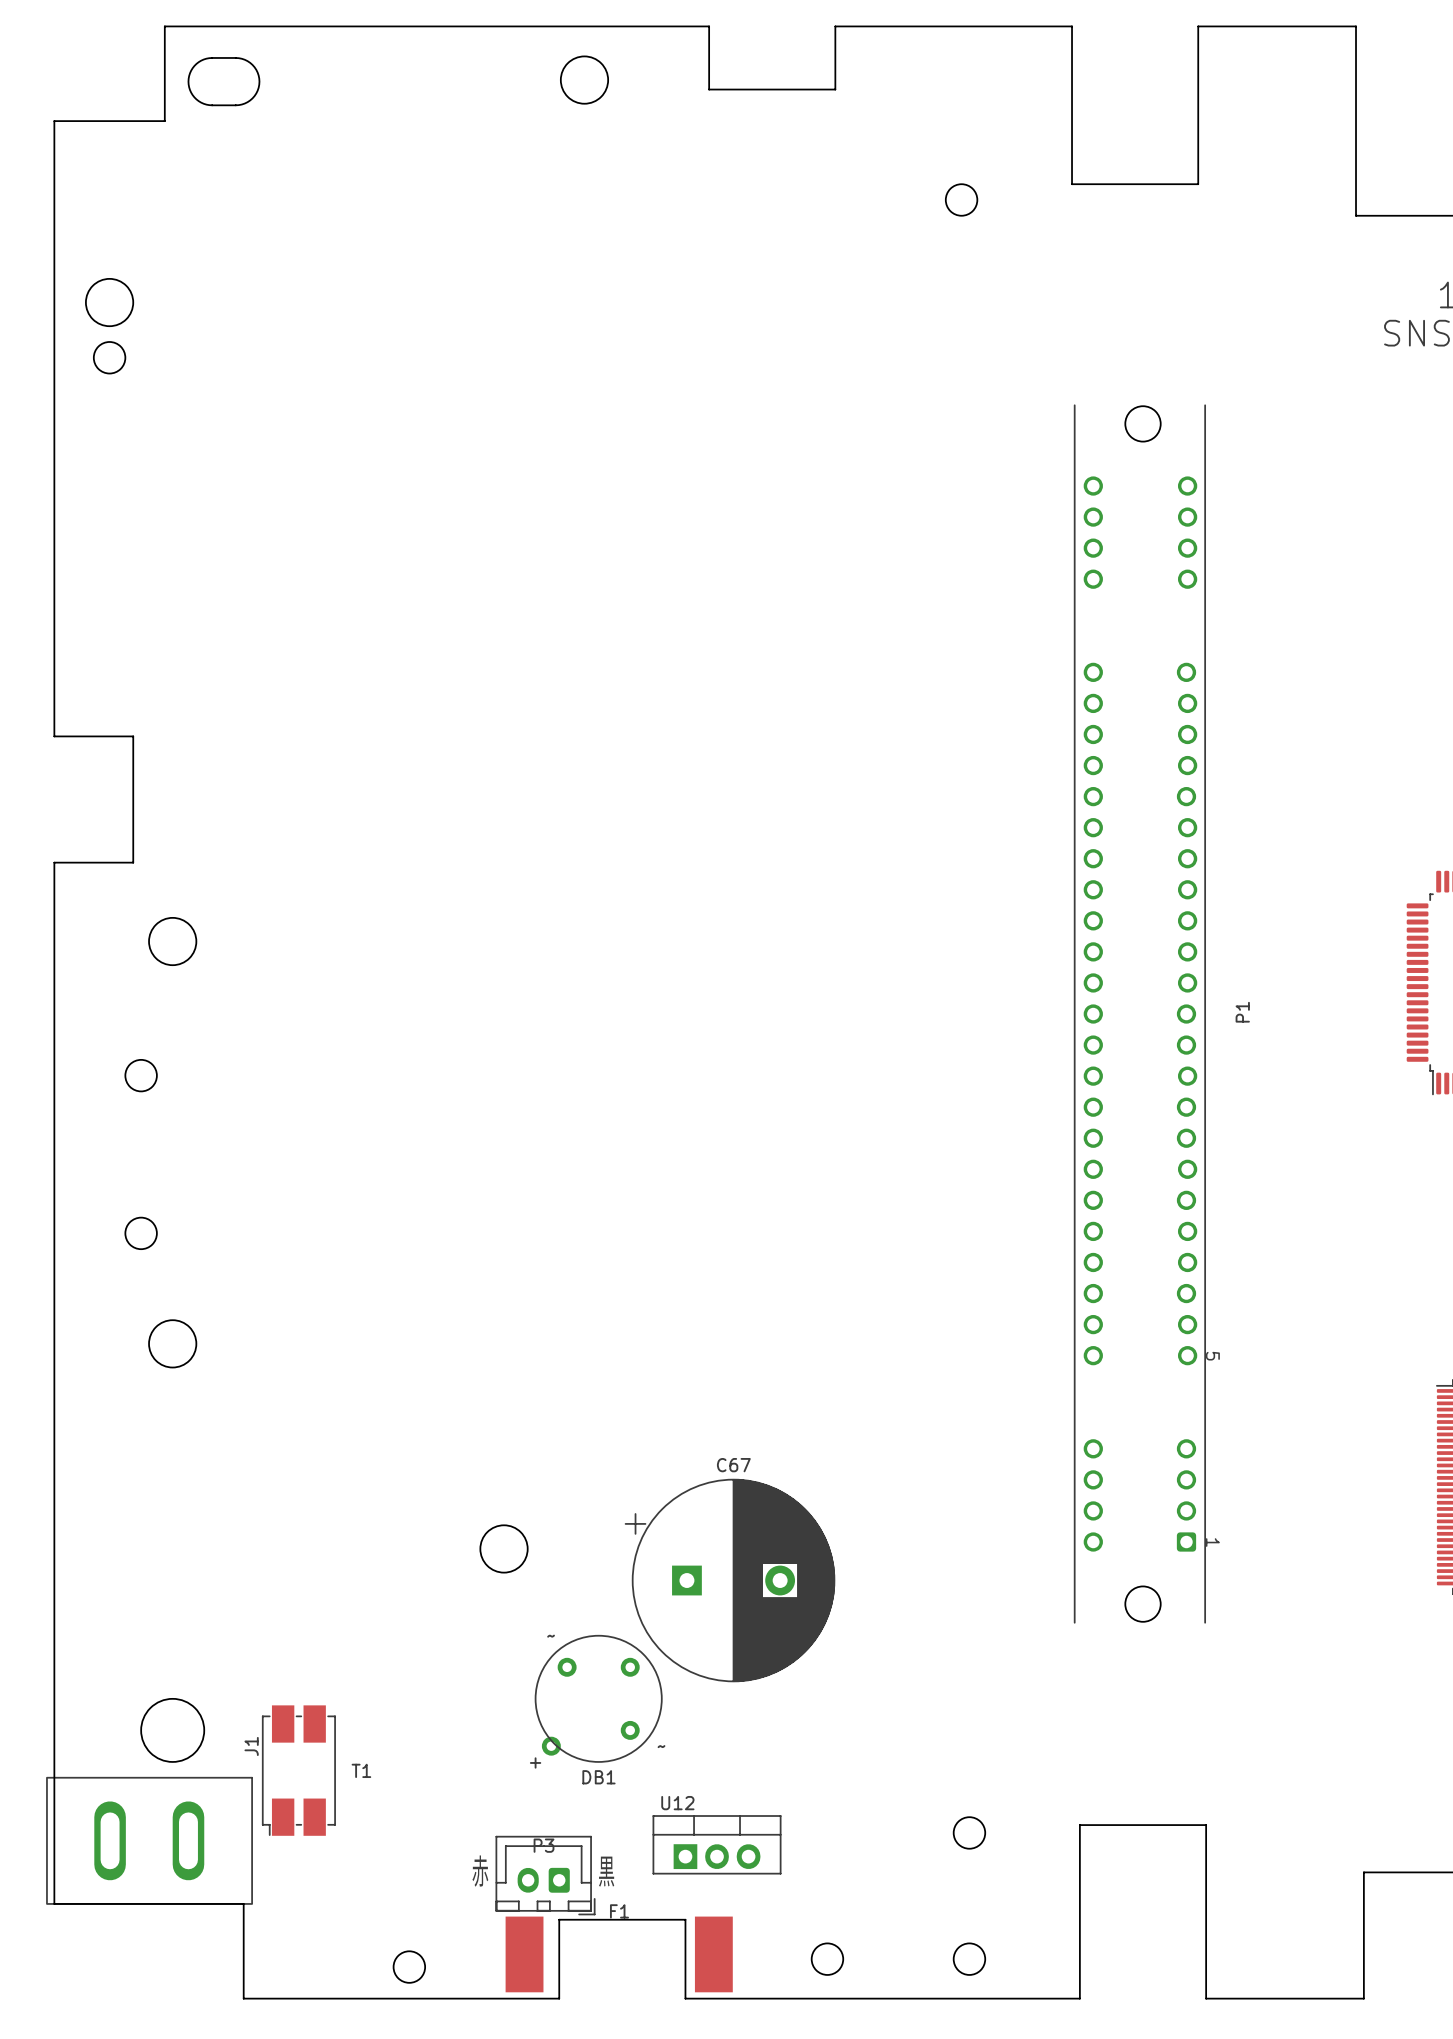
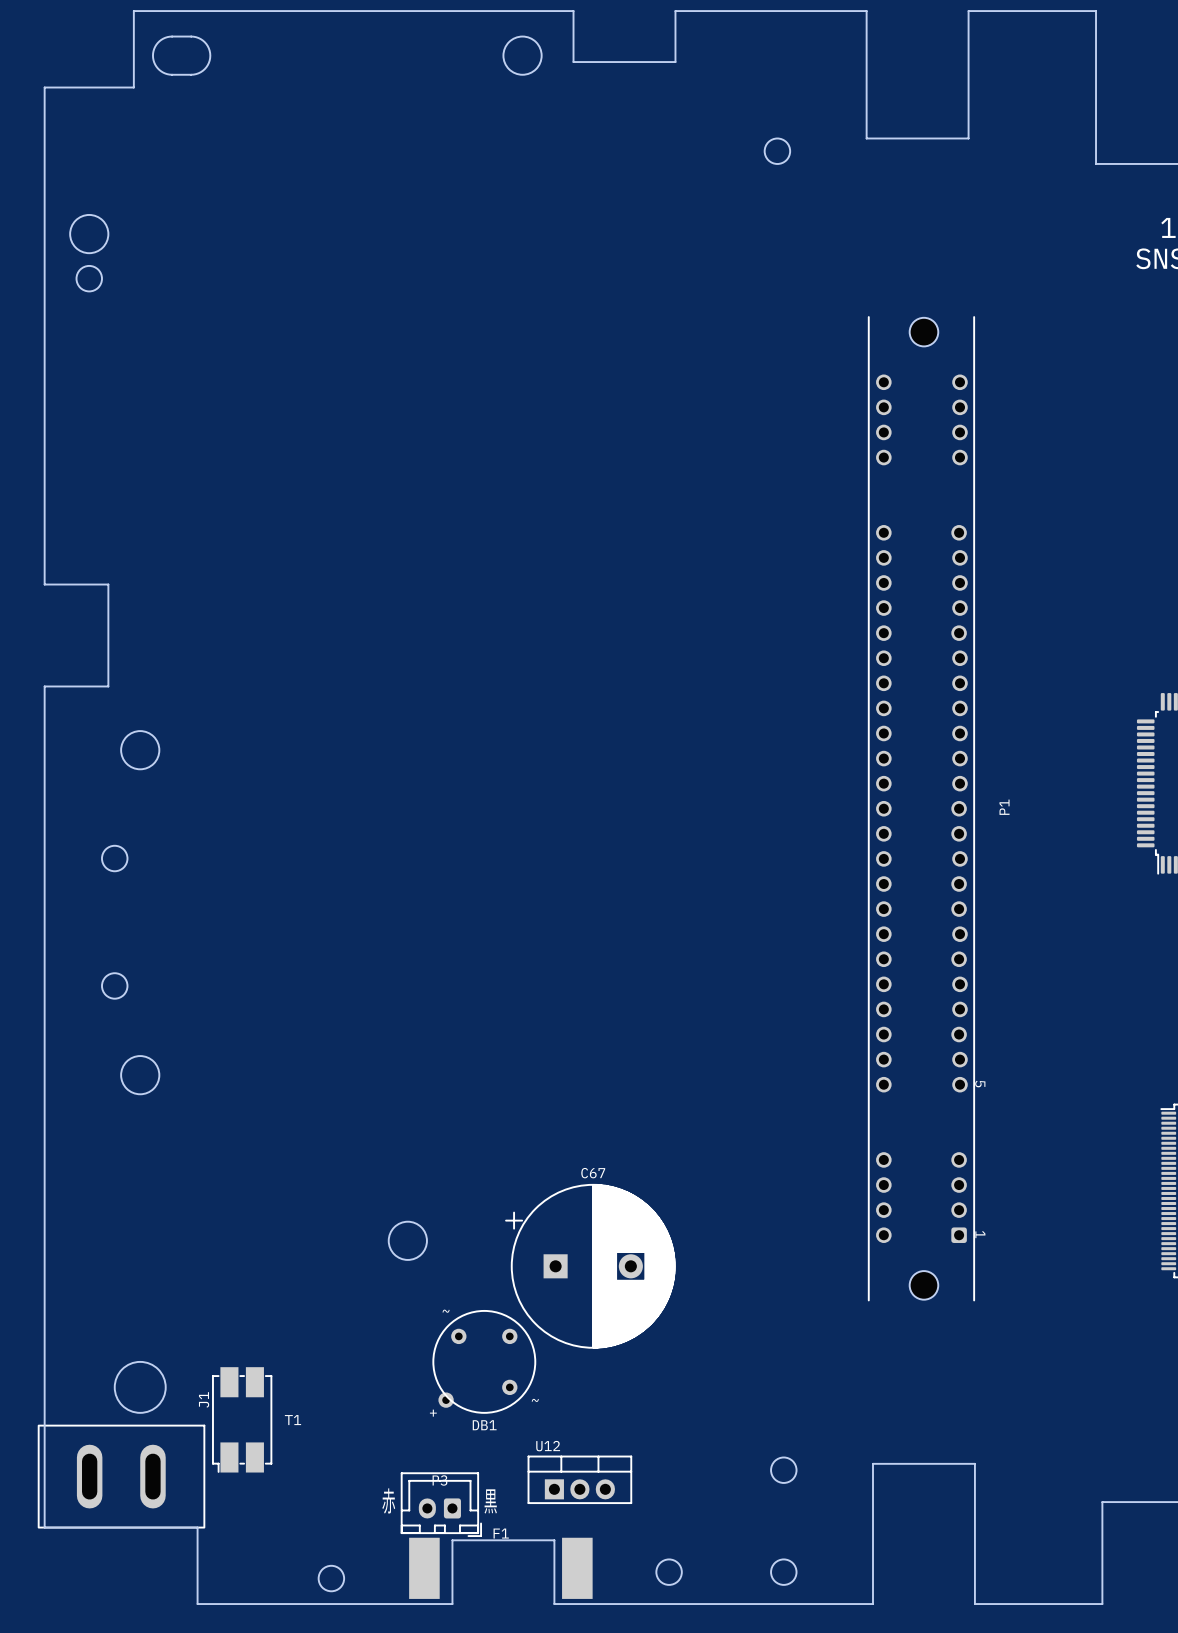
round board edge: [560, 55, 609, 105] -> none
round board edge: none -> [502, 36, 543, 76]

